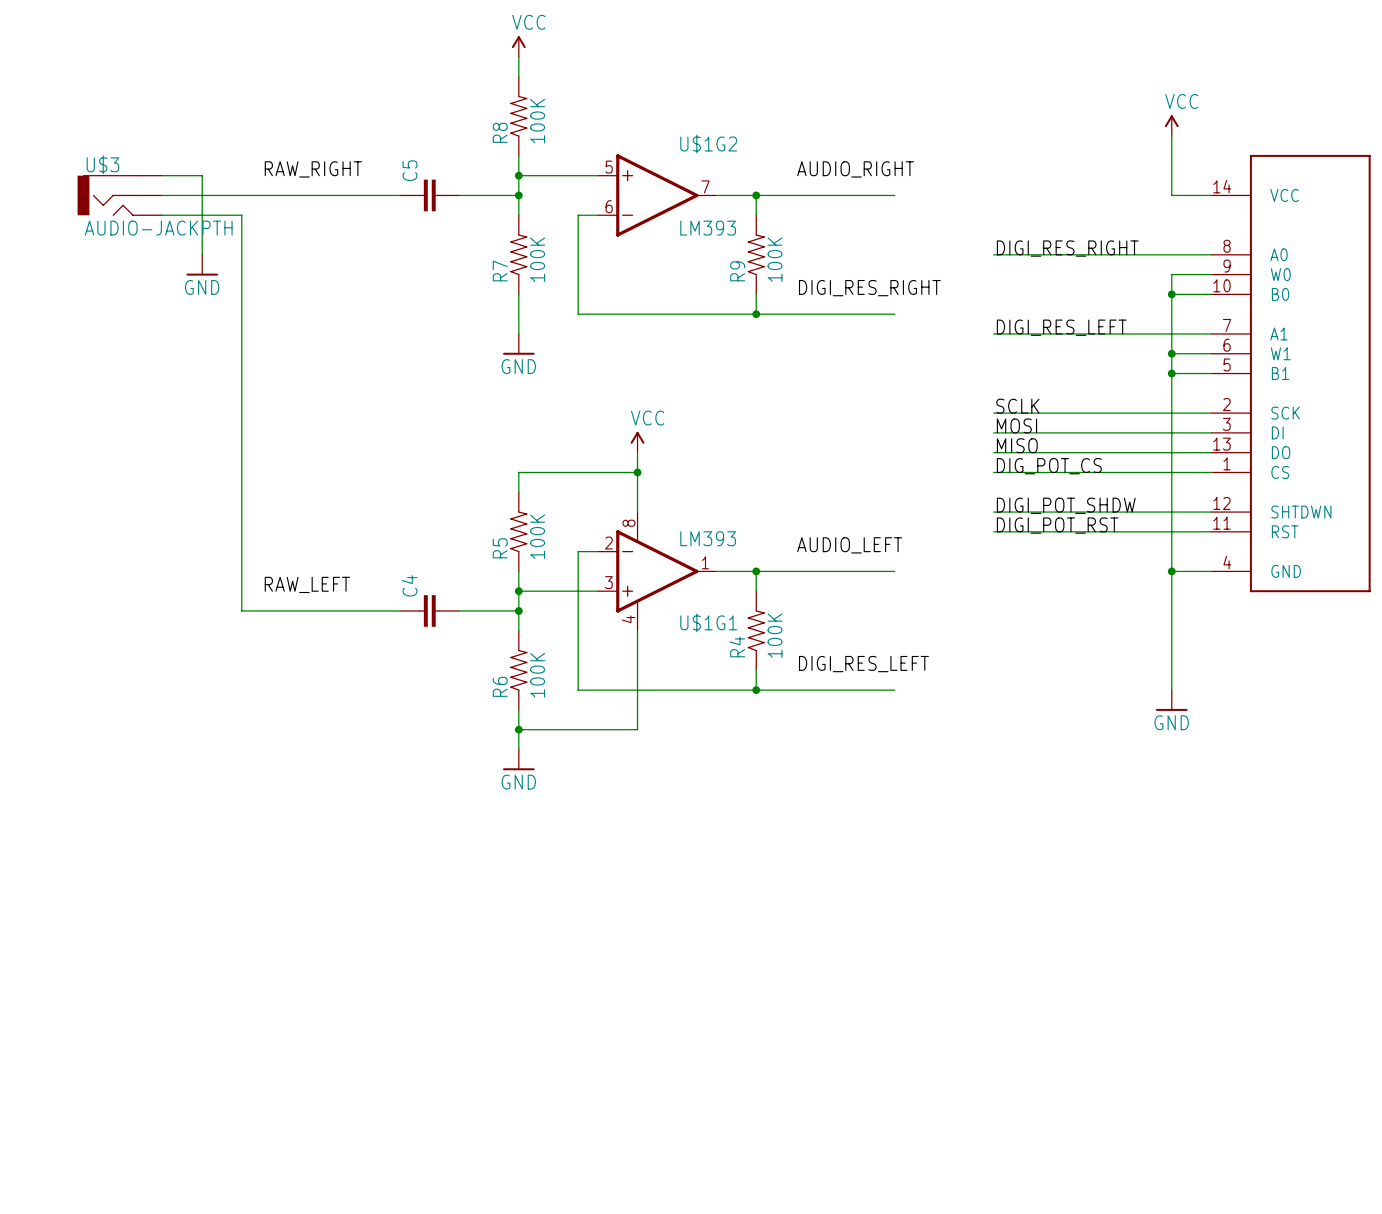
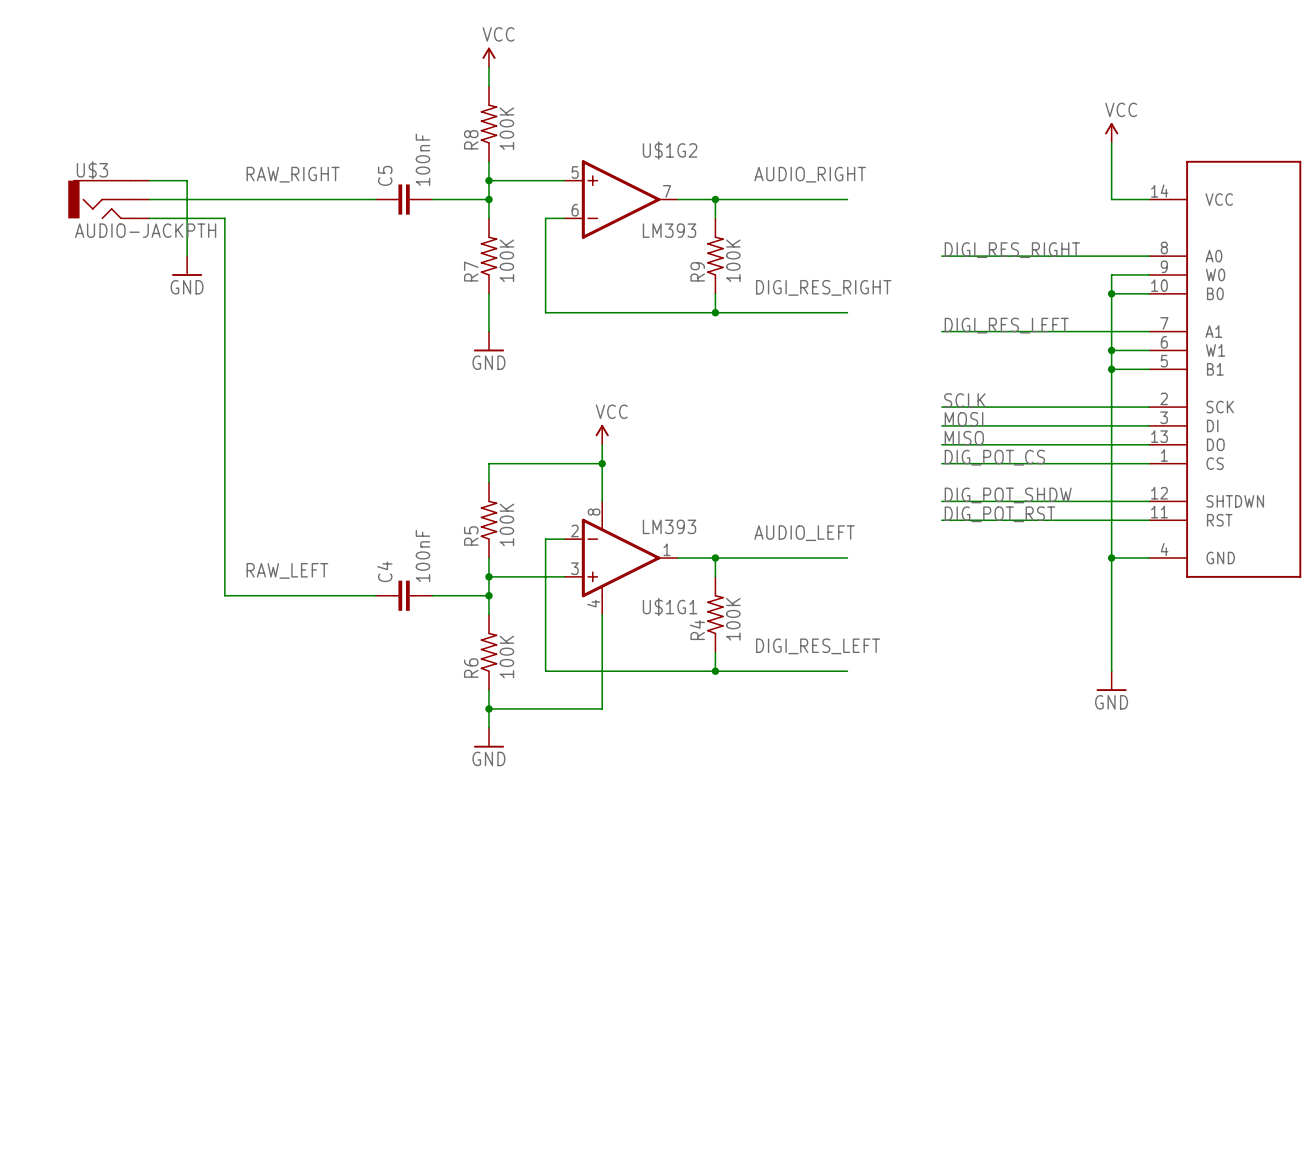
C5 value: none -> 100nF (422, 159)
label: DIGI_POT_SHDW (1066, 505) -> DIG_POT_SHDW (1008, 495)
label: DIGI_POT_RST (1057, 525) -> DIG_POT_RST (999, 514)
C4 value: none -> 100nF (422, 555)

